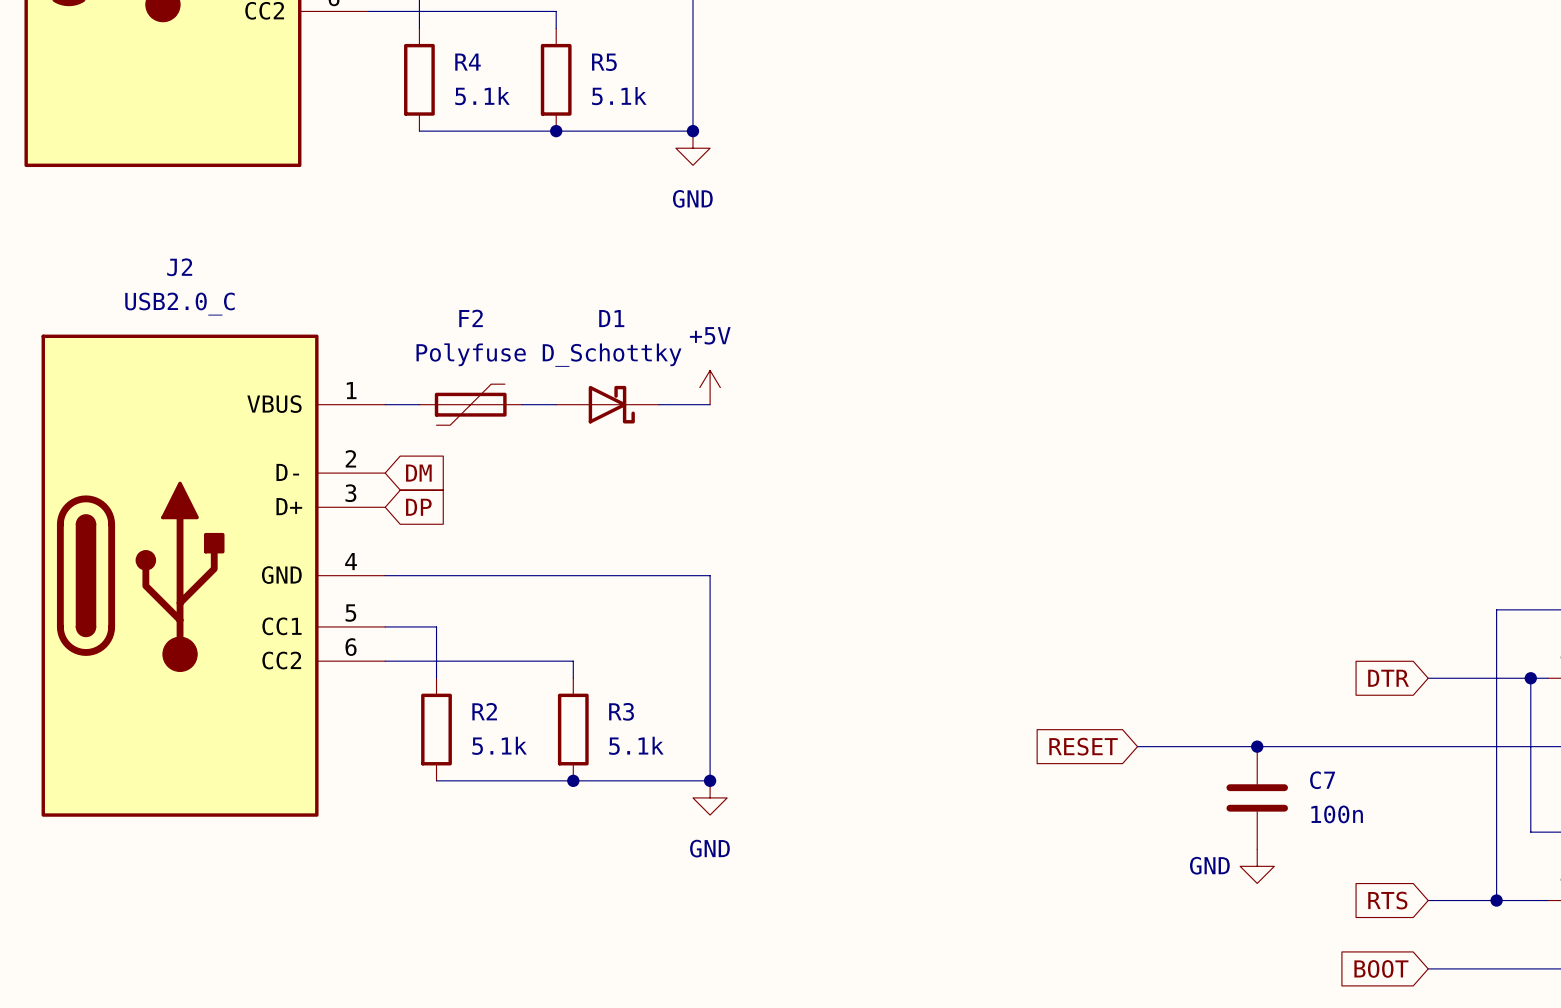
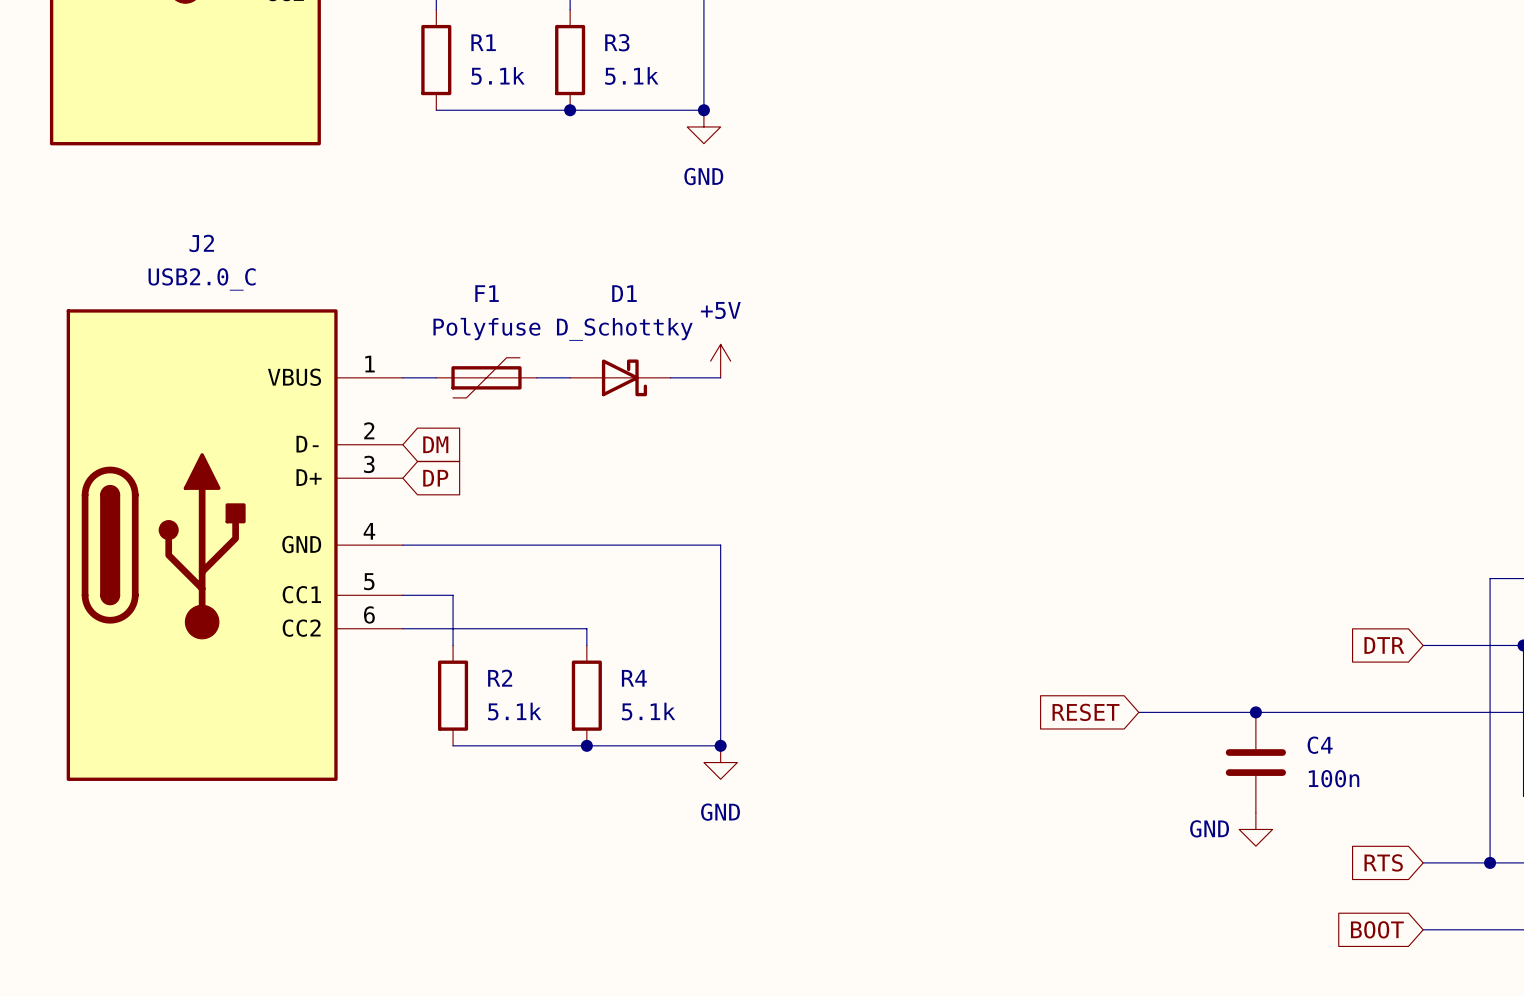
R4 name: R4 (467, 62) -> R1 (483, 42)
R5 name: R5 (604, 62) -> R3 (617, 42)
F2 name: F2 (471, 318) -> F1 (487, 293)
R3 name: R3 (621, 711) -> R4 (634, 678)
C7 name: C7 (1322, 780) -> C4 (1320, 745)

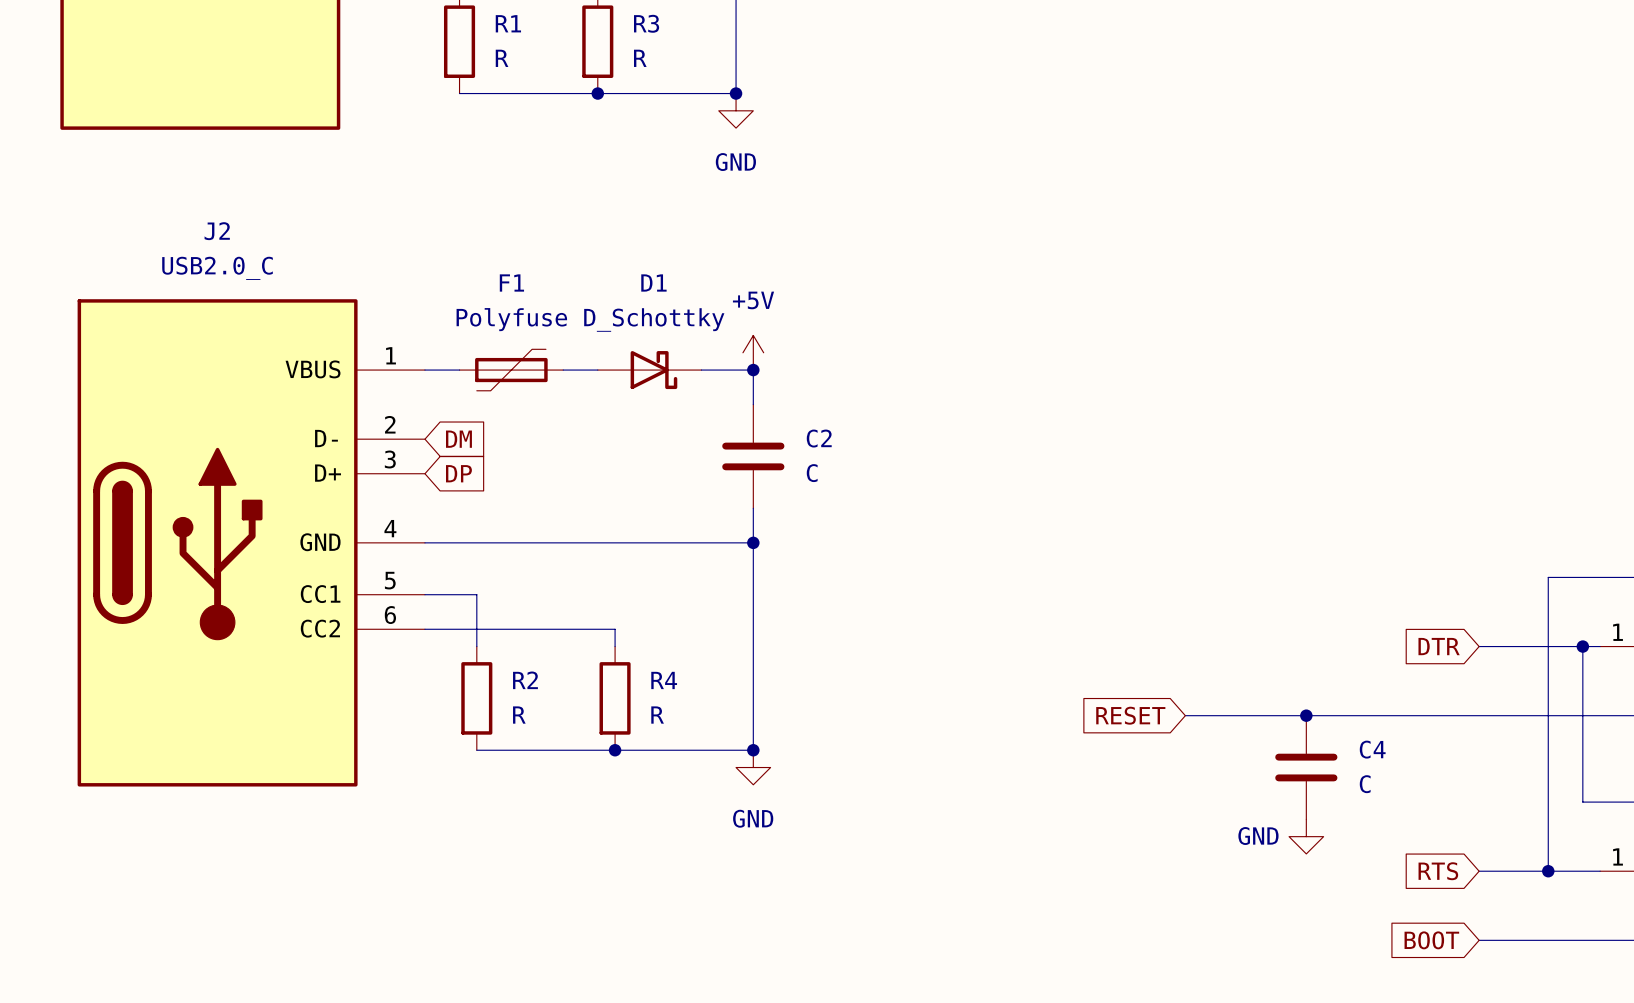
R1 value: 5.1k (498, 75) -> R (502, 58)
R3 value: 5.1k (631, 75) -> R (640, 58)
wire: none -> (753, 370) (753, 404)
junction: none -> (753, 370)
C2: none -> C (753, 456)
wire: none -> (753, 508) (753, 542)
junction: none -> (753, 542)
R2 value: 5.1k (514, 711) -> R (519, 715)
R4 value: 5.1k (648, 711) -> R (657, 715)
C4 value: 100n (1334, 778) -> C (1365, 784)

